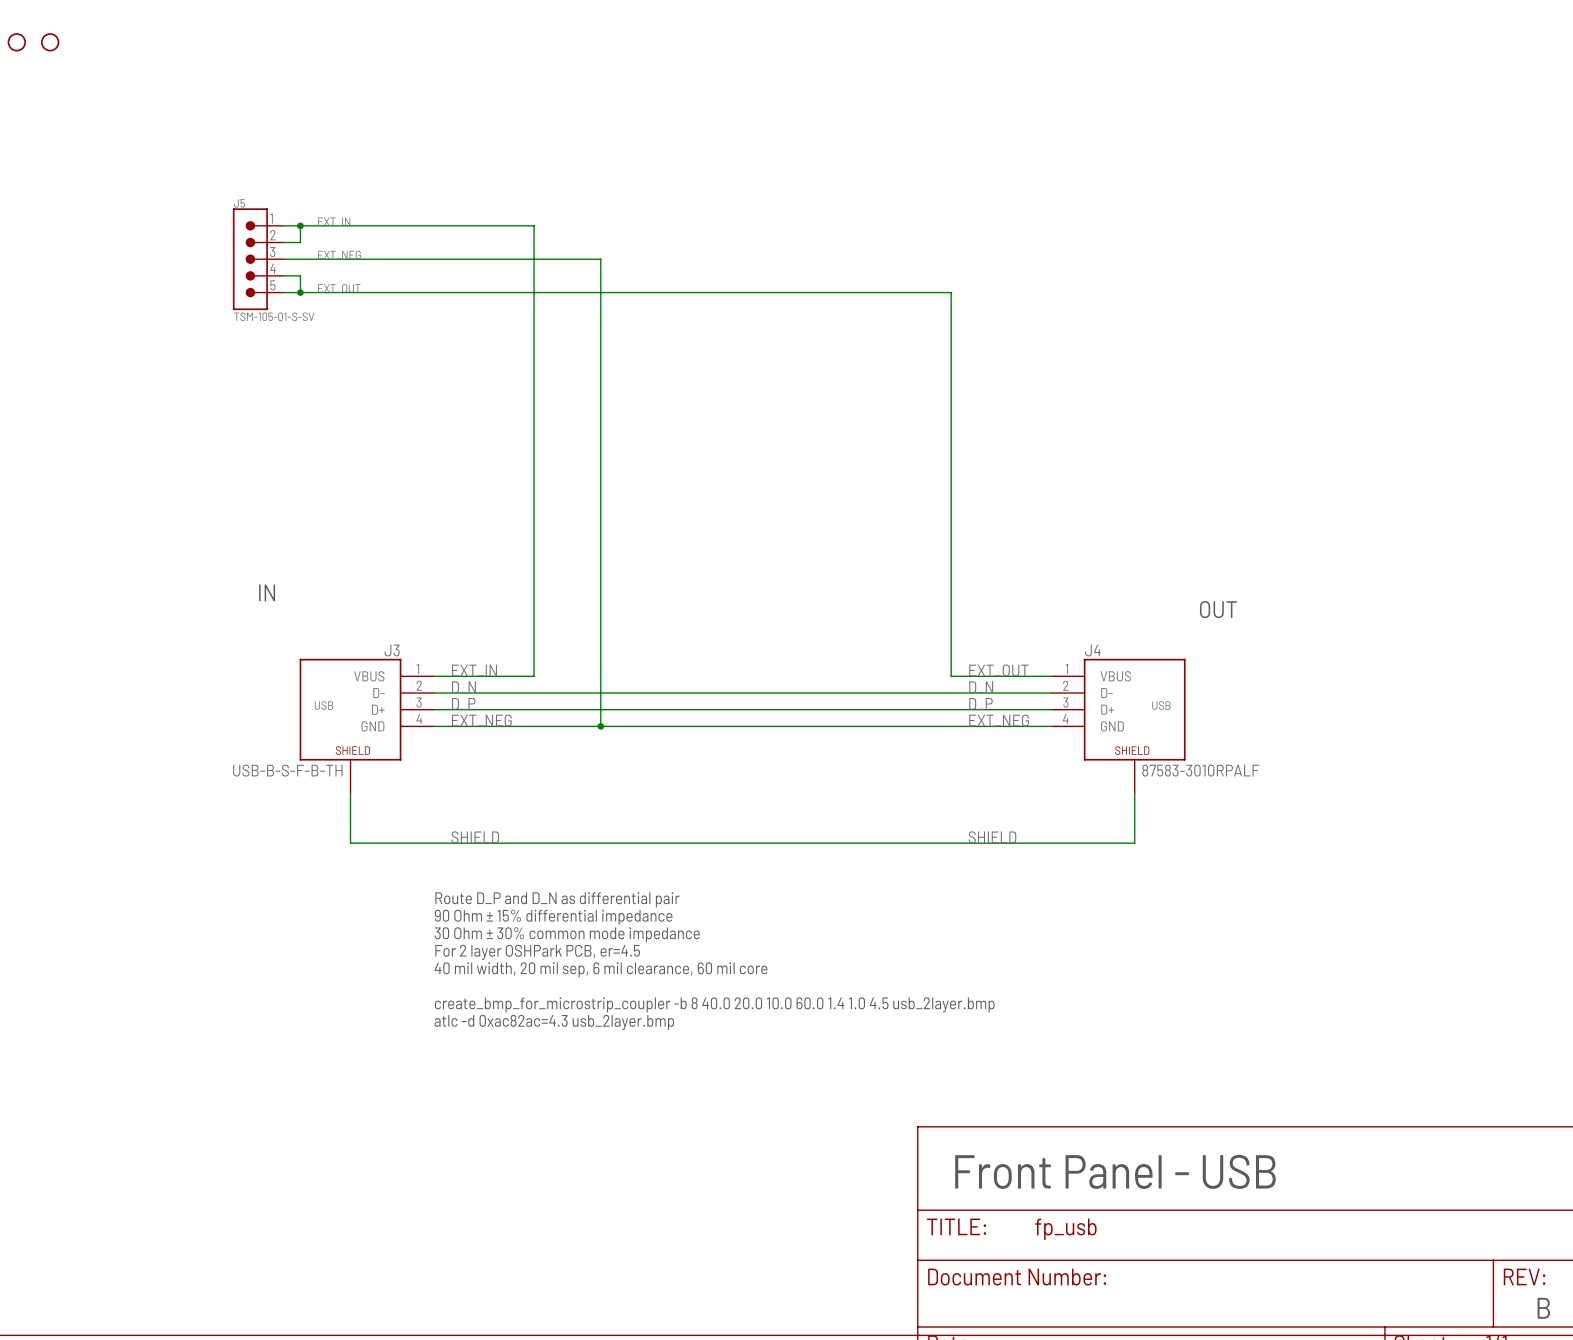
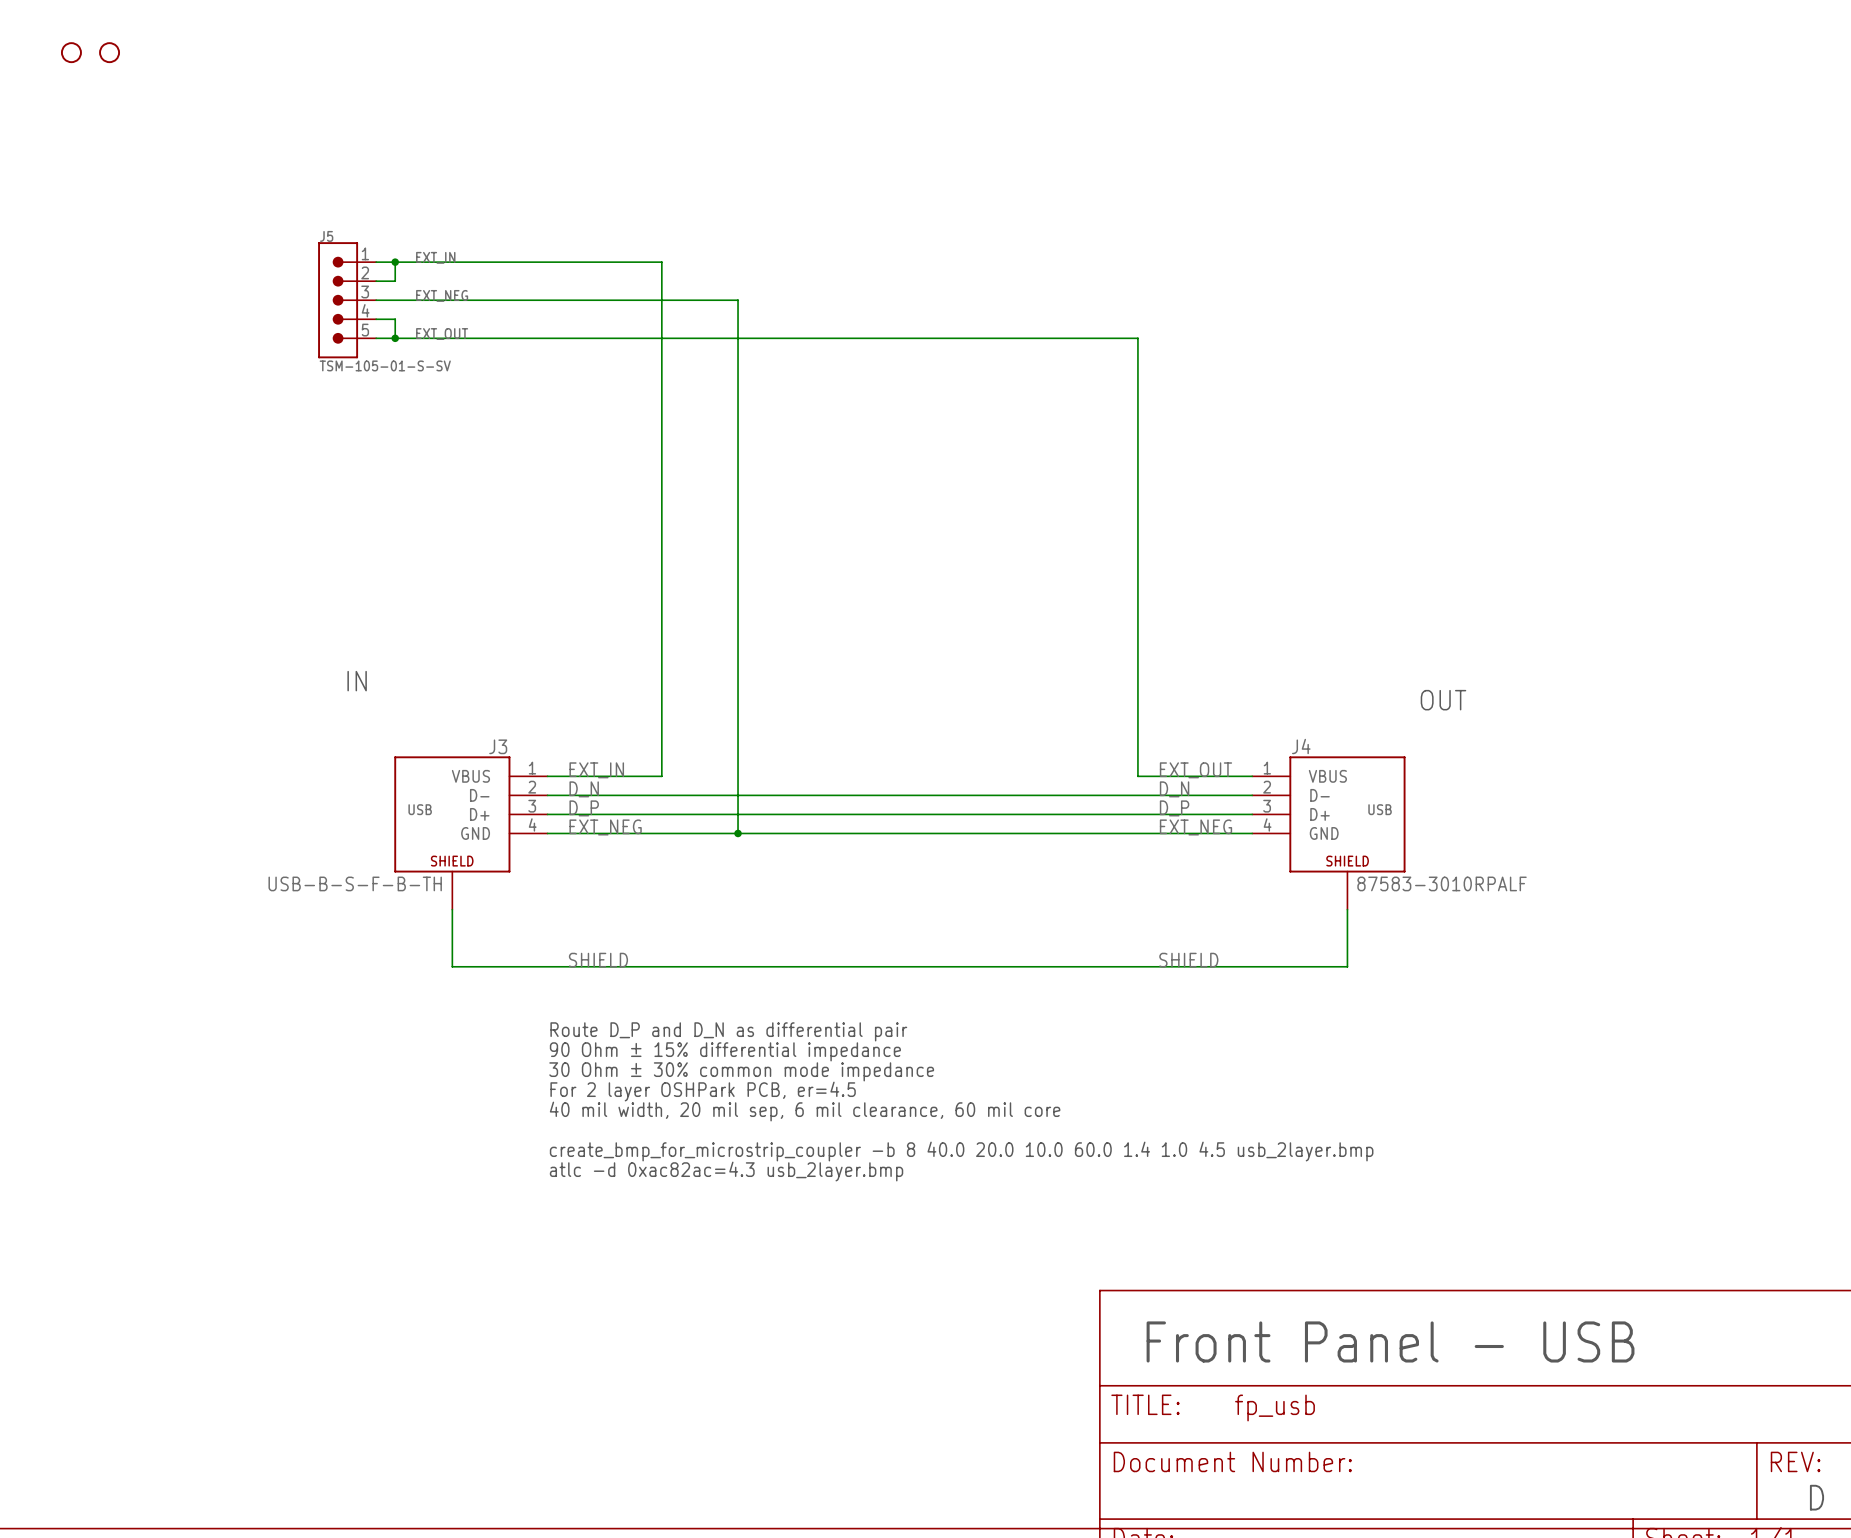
text: B (1543, 1308) -> D (1816, 1497)

